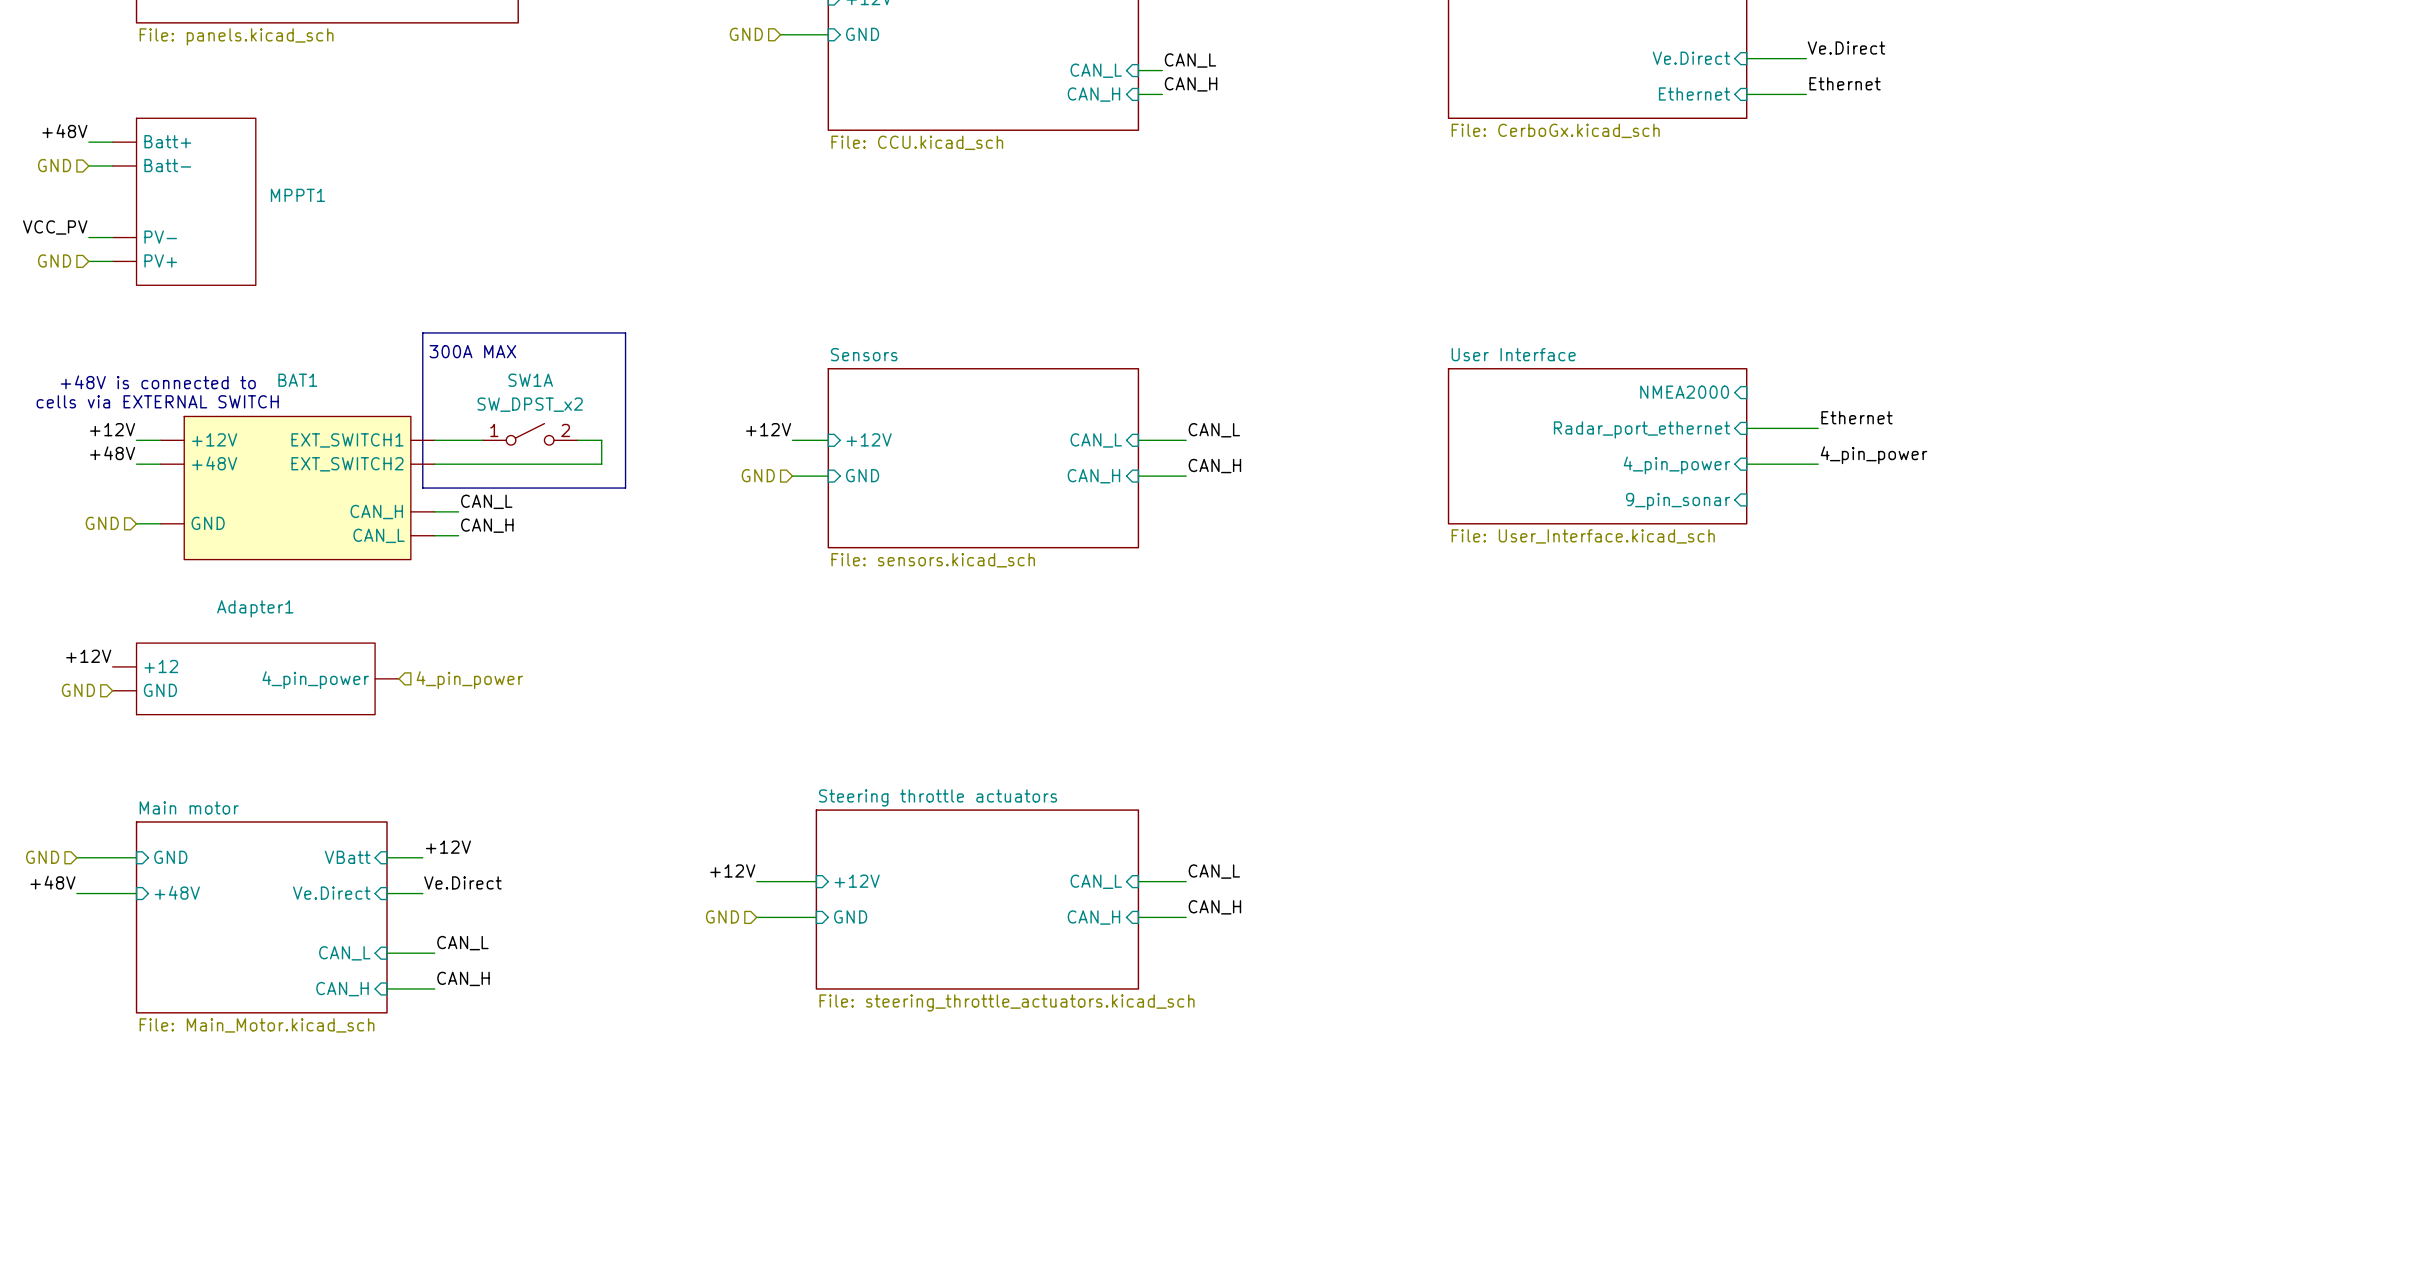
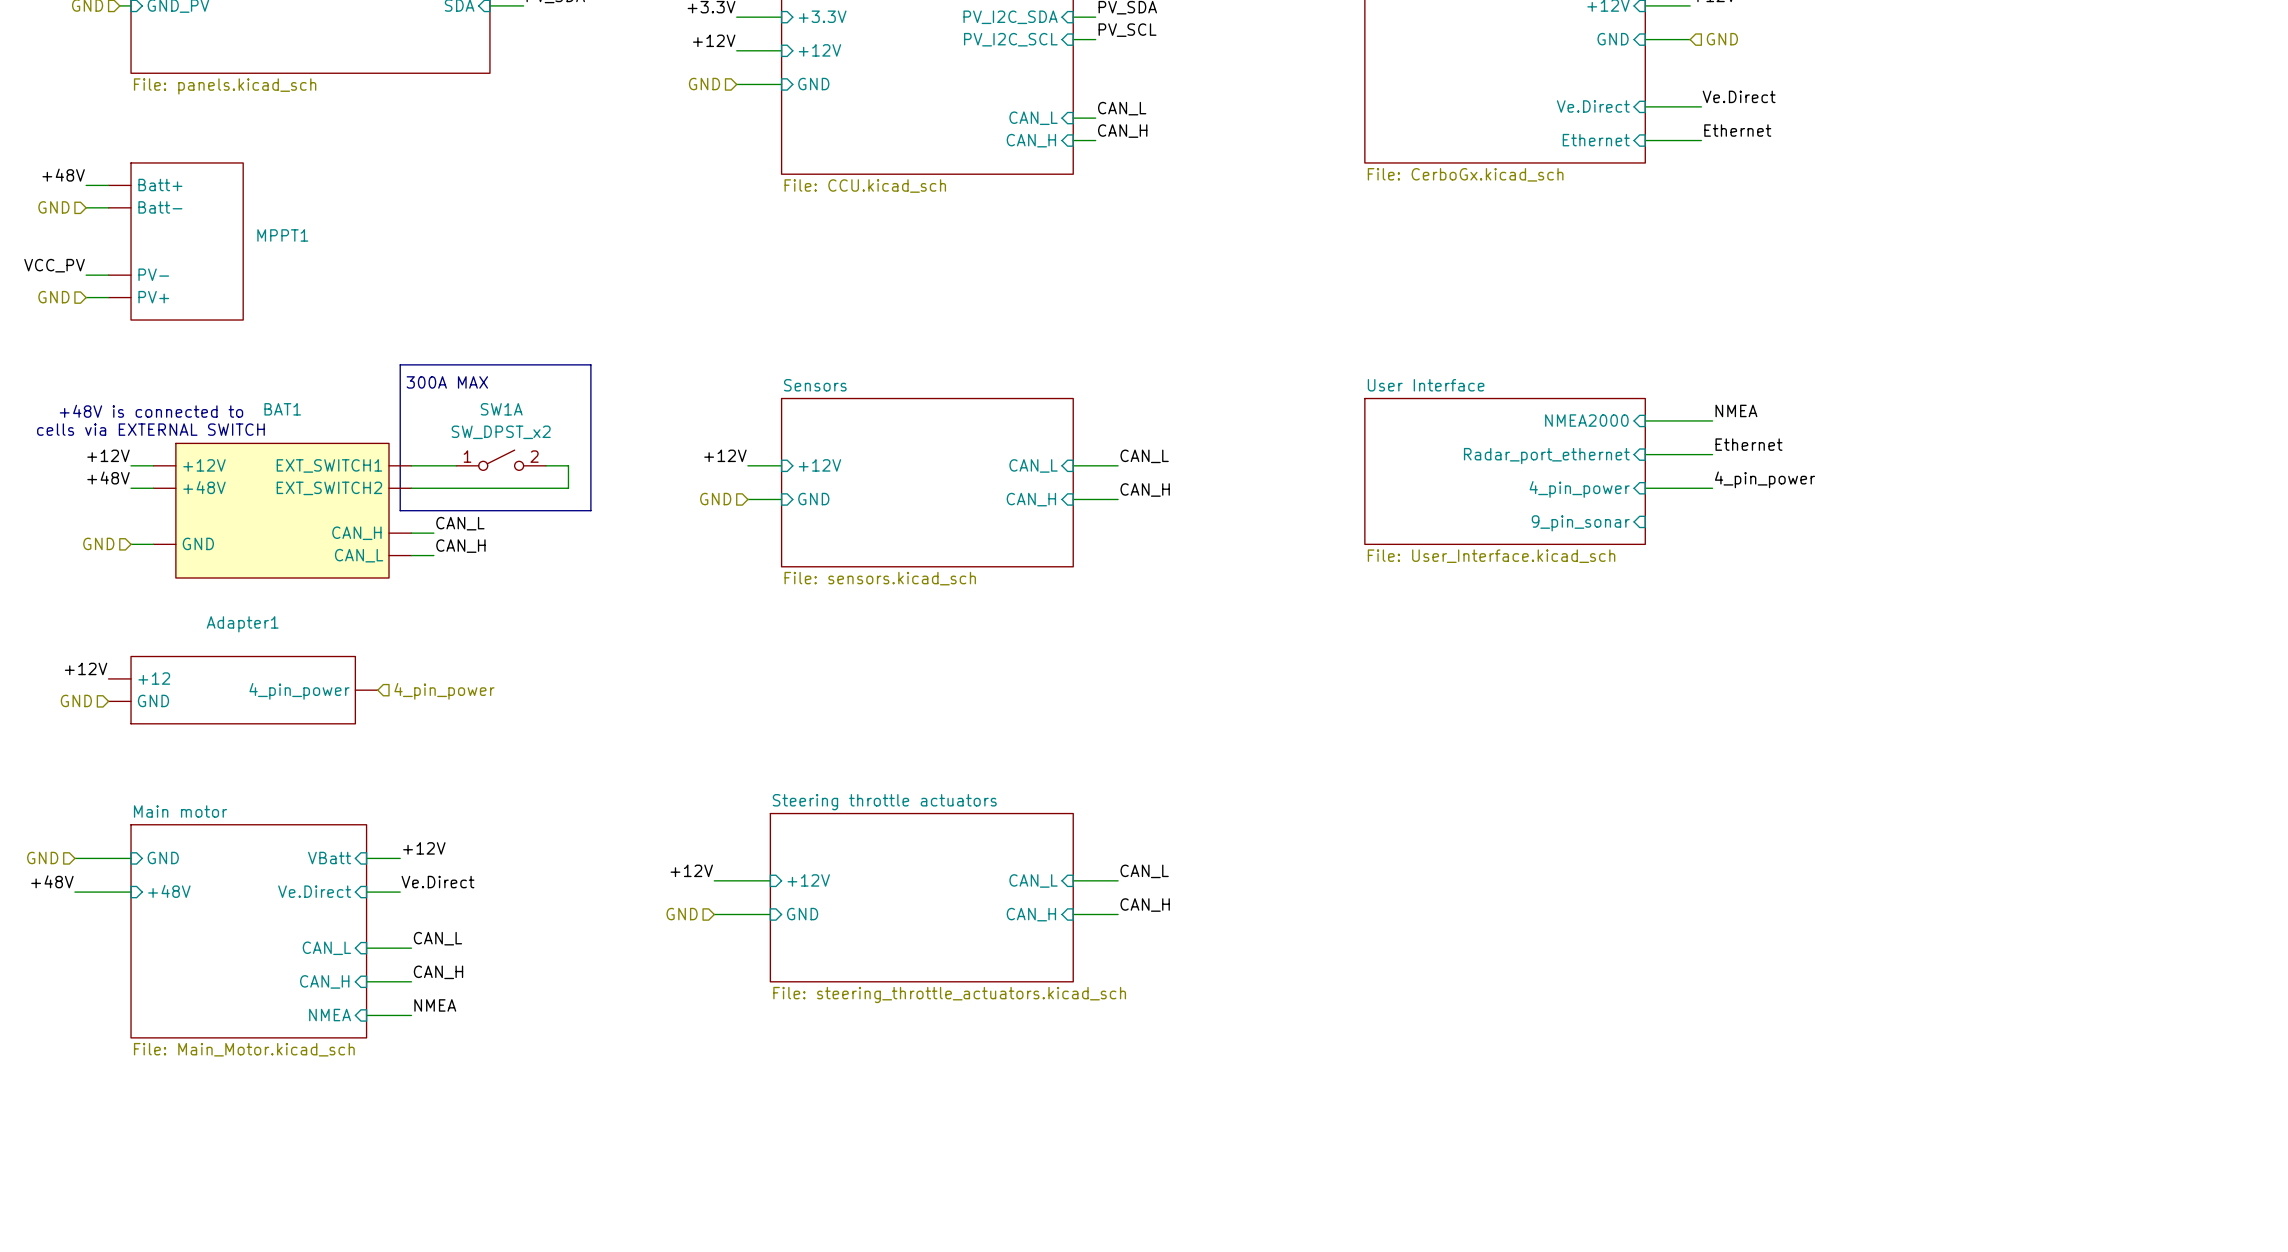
label: none -> NMEA (1736, 410)
wire: none -> (1645, 420) (1712, 420)
sheet Main motor: File: Main_Motor.kicad_sch (261, 917) -> none
sheet Main motor: none -> File: Main_Motor.kicad_sch (248, 931)
label: none -> NMEA (435, 1005)
sheet pin: none -> NMEA (330, 1015)
wire: none -> (366, 1015) (411, 1015)

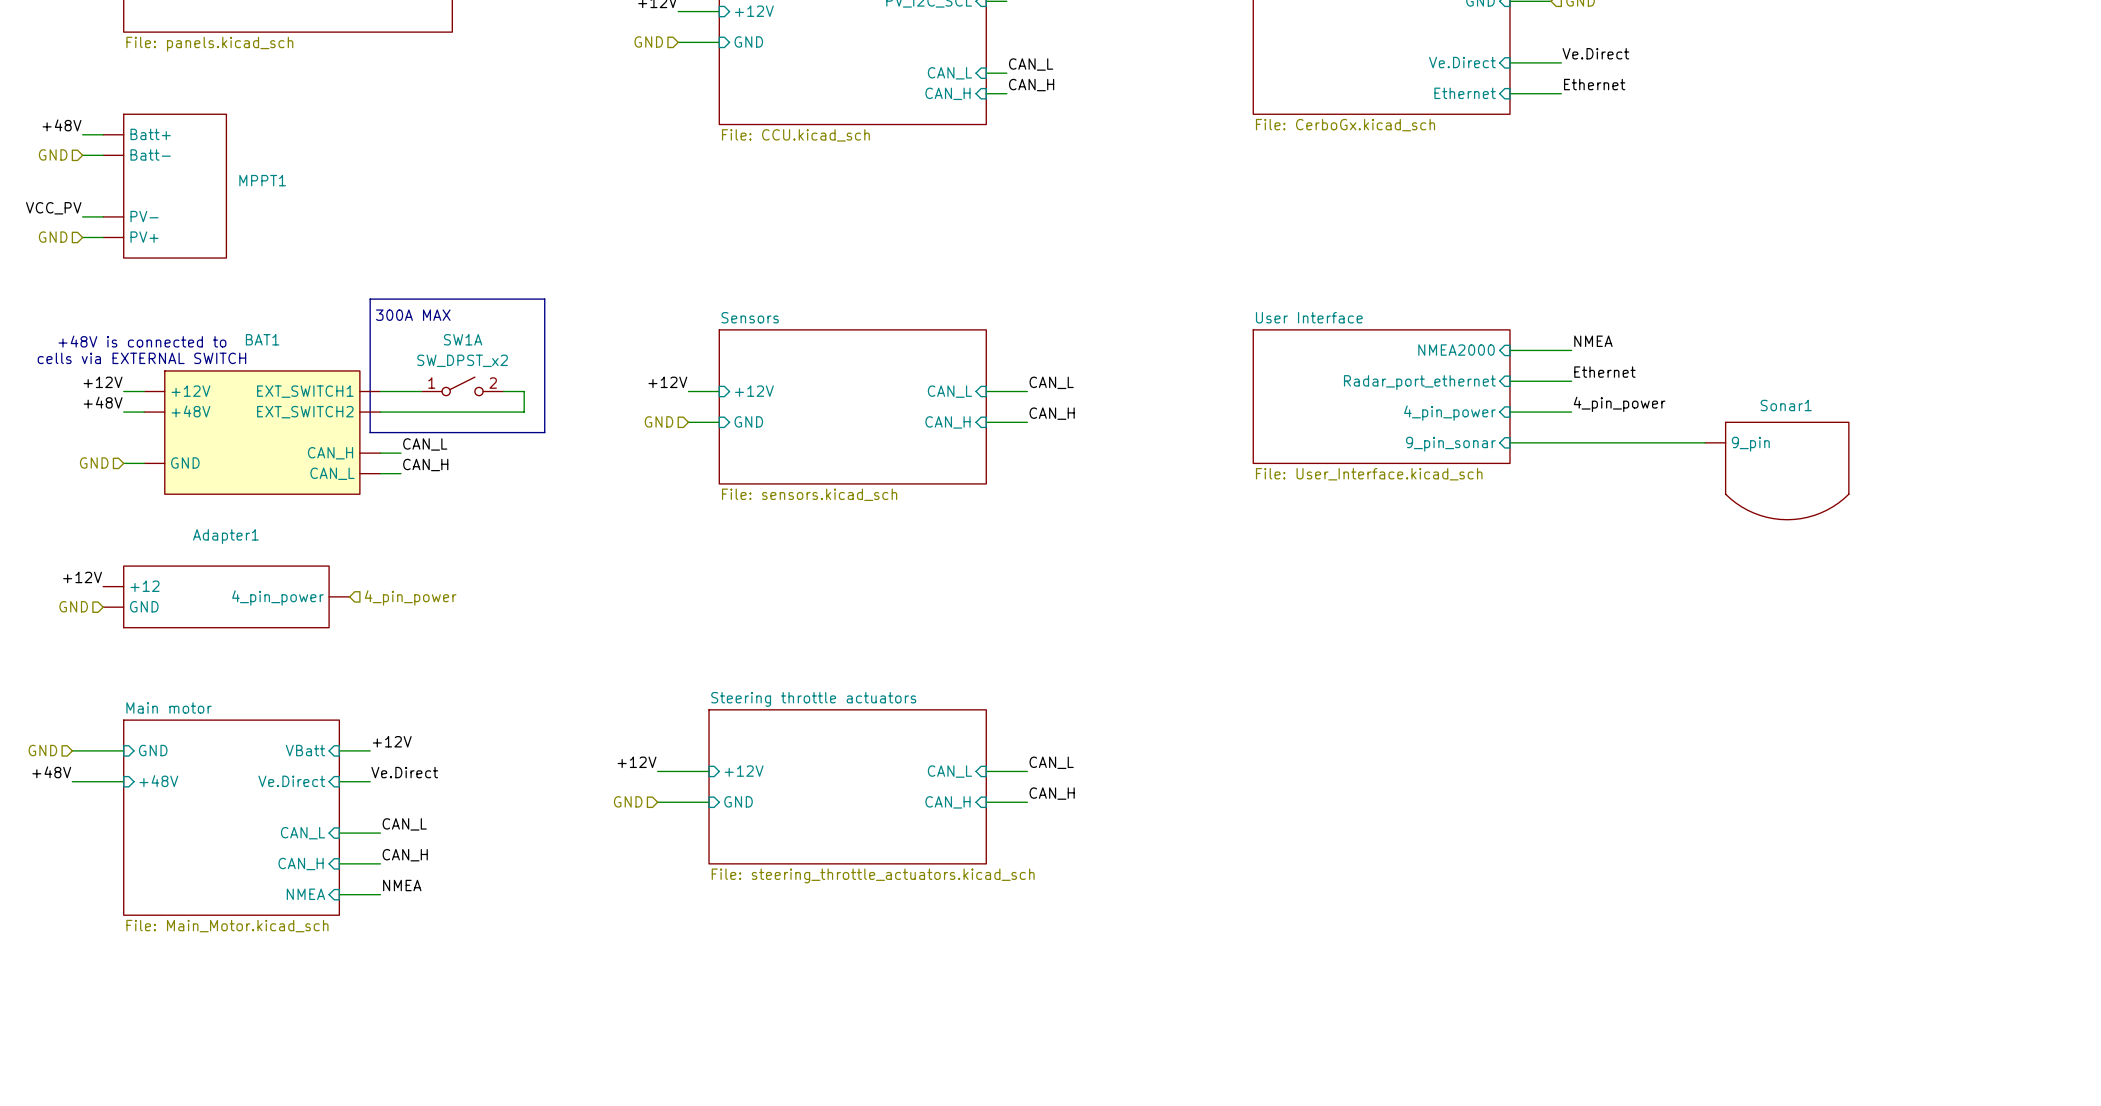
wire: none -> (1509, 442) (1705, 442)
Sonar1: none -> (1776, 471)

